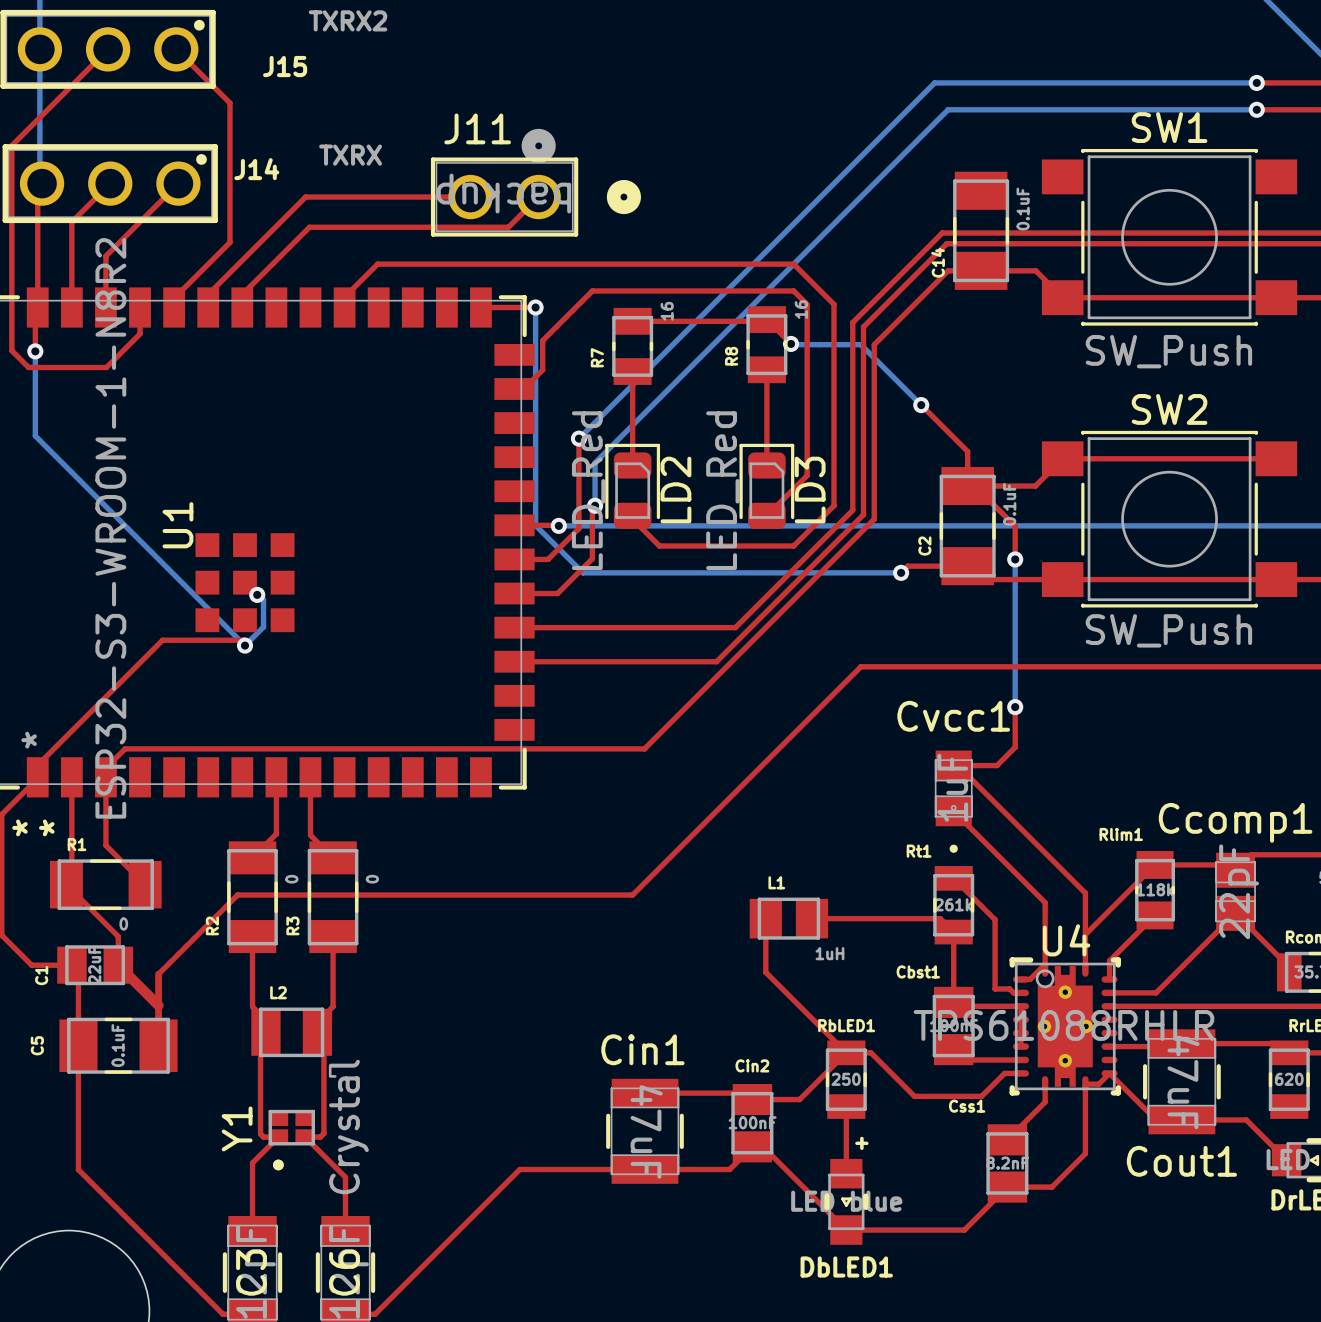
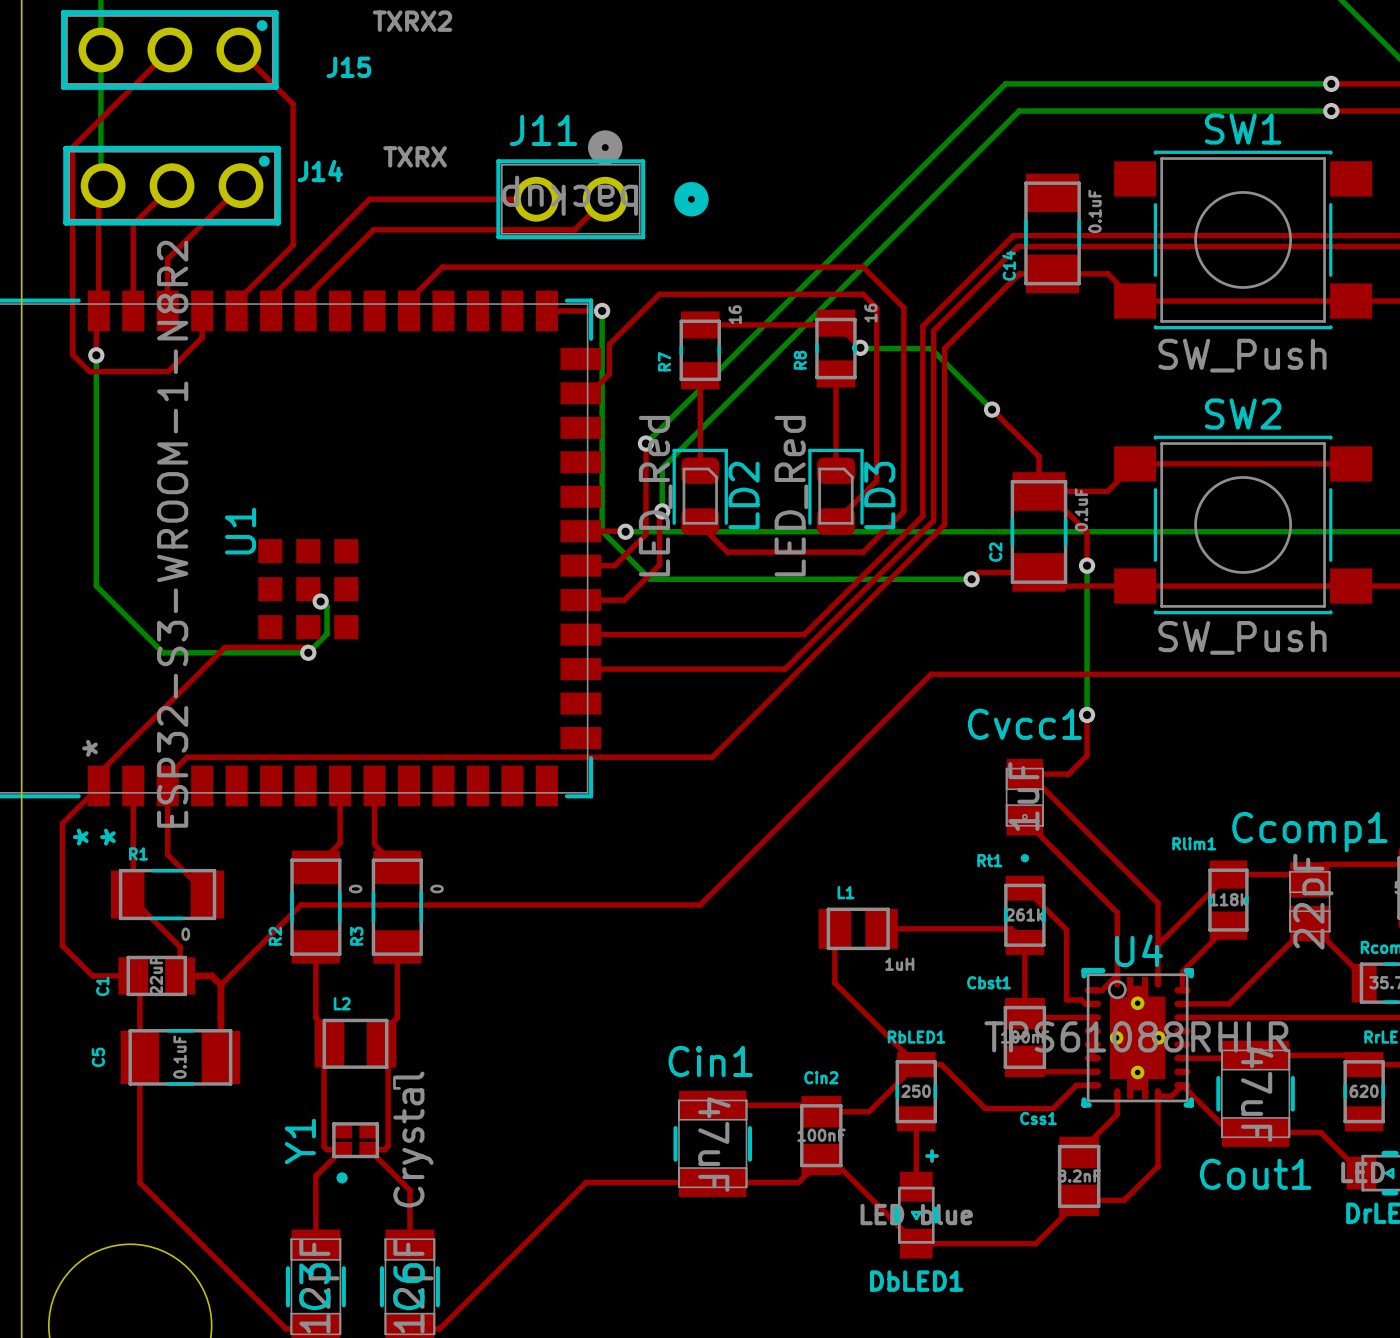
bottom track: (35, 435) (245, 645) -> (96, 440) (96, 586) (163, 652) (308, 652)
top track: (118, 965) (158, 1005) -> (180, 975) (211, 975) (220, 984)

